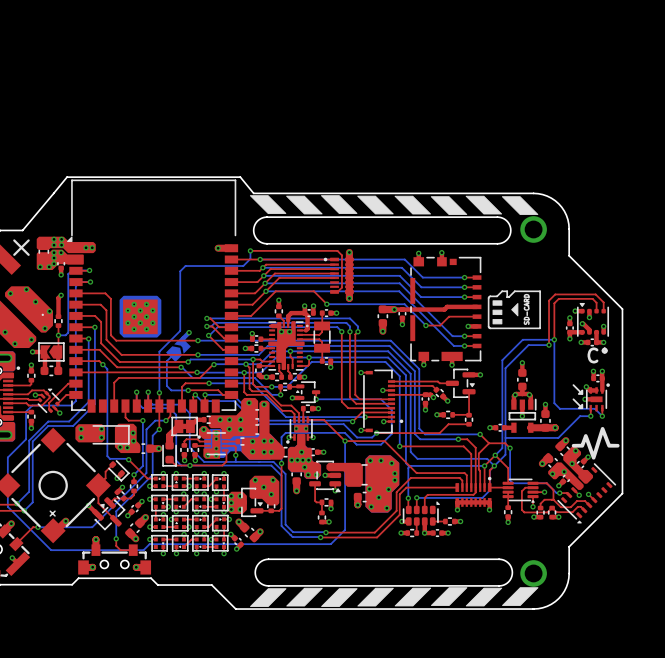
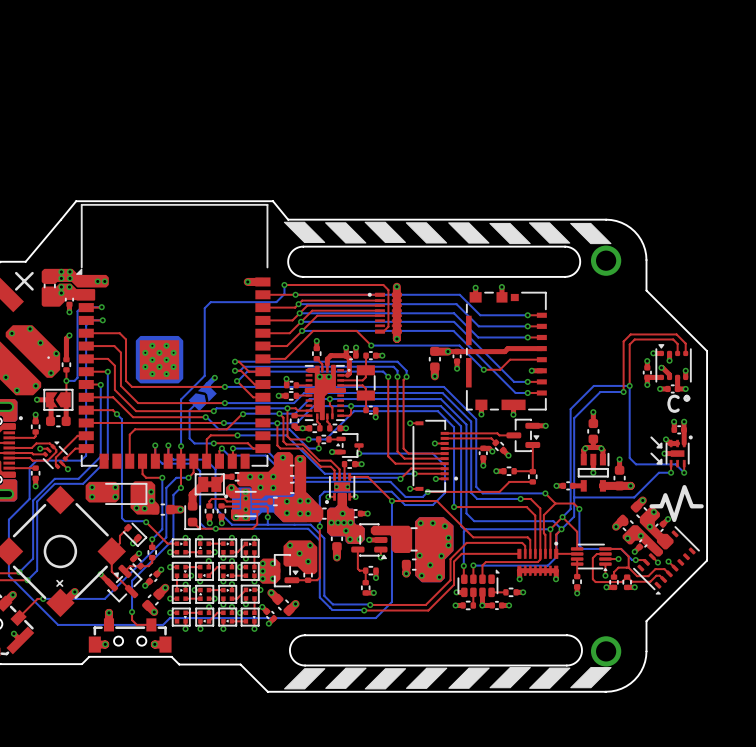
via: (54, 263) -> none
via: (40, 266) -> none
via: (49, 266) -> none
drawing: [488, 290, 541, 329] -> none

